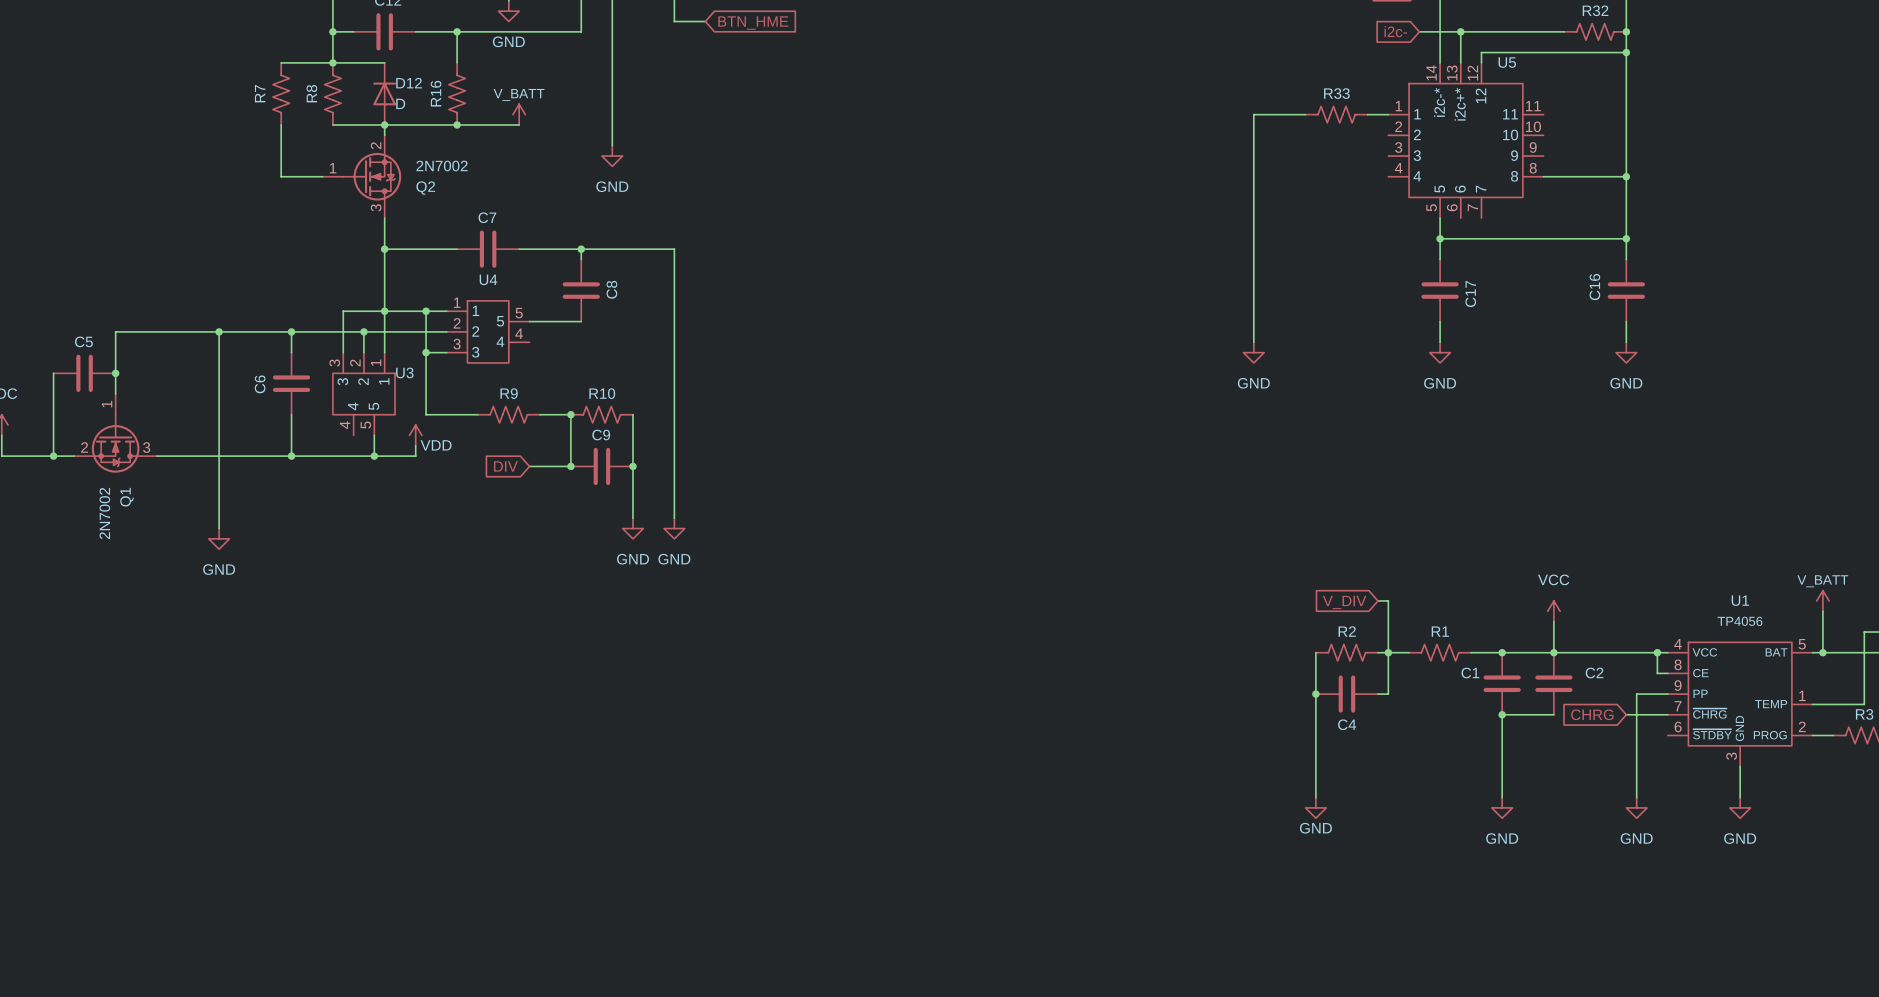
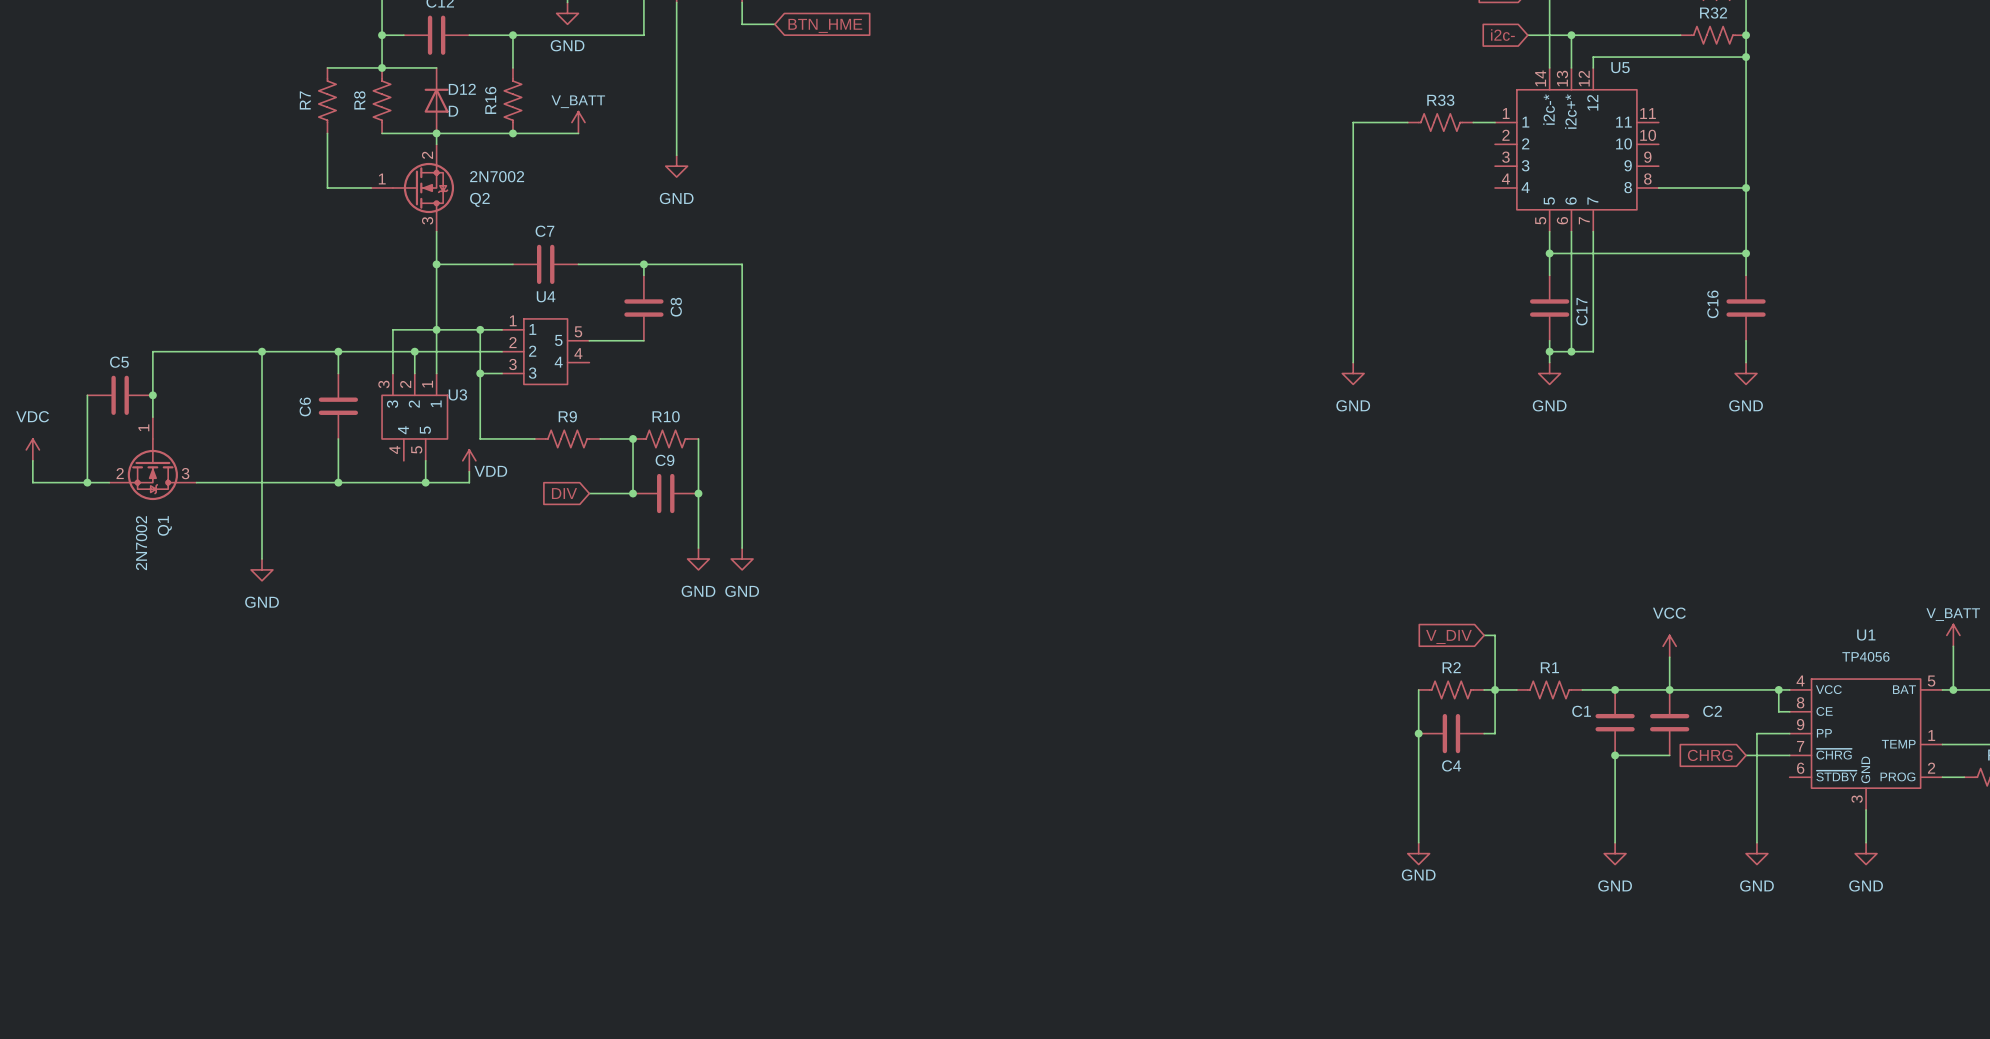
wire: none -> (1571, 231) (1571, 351)
wire: none -> (1593, 231) (1593, 351) (1549, 351)
junction: none -> (1549, 351)
junction: none -> (1571, 351)

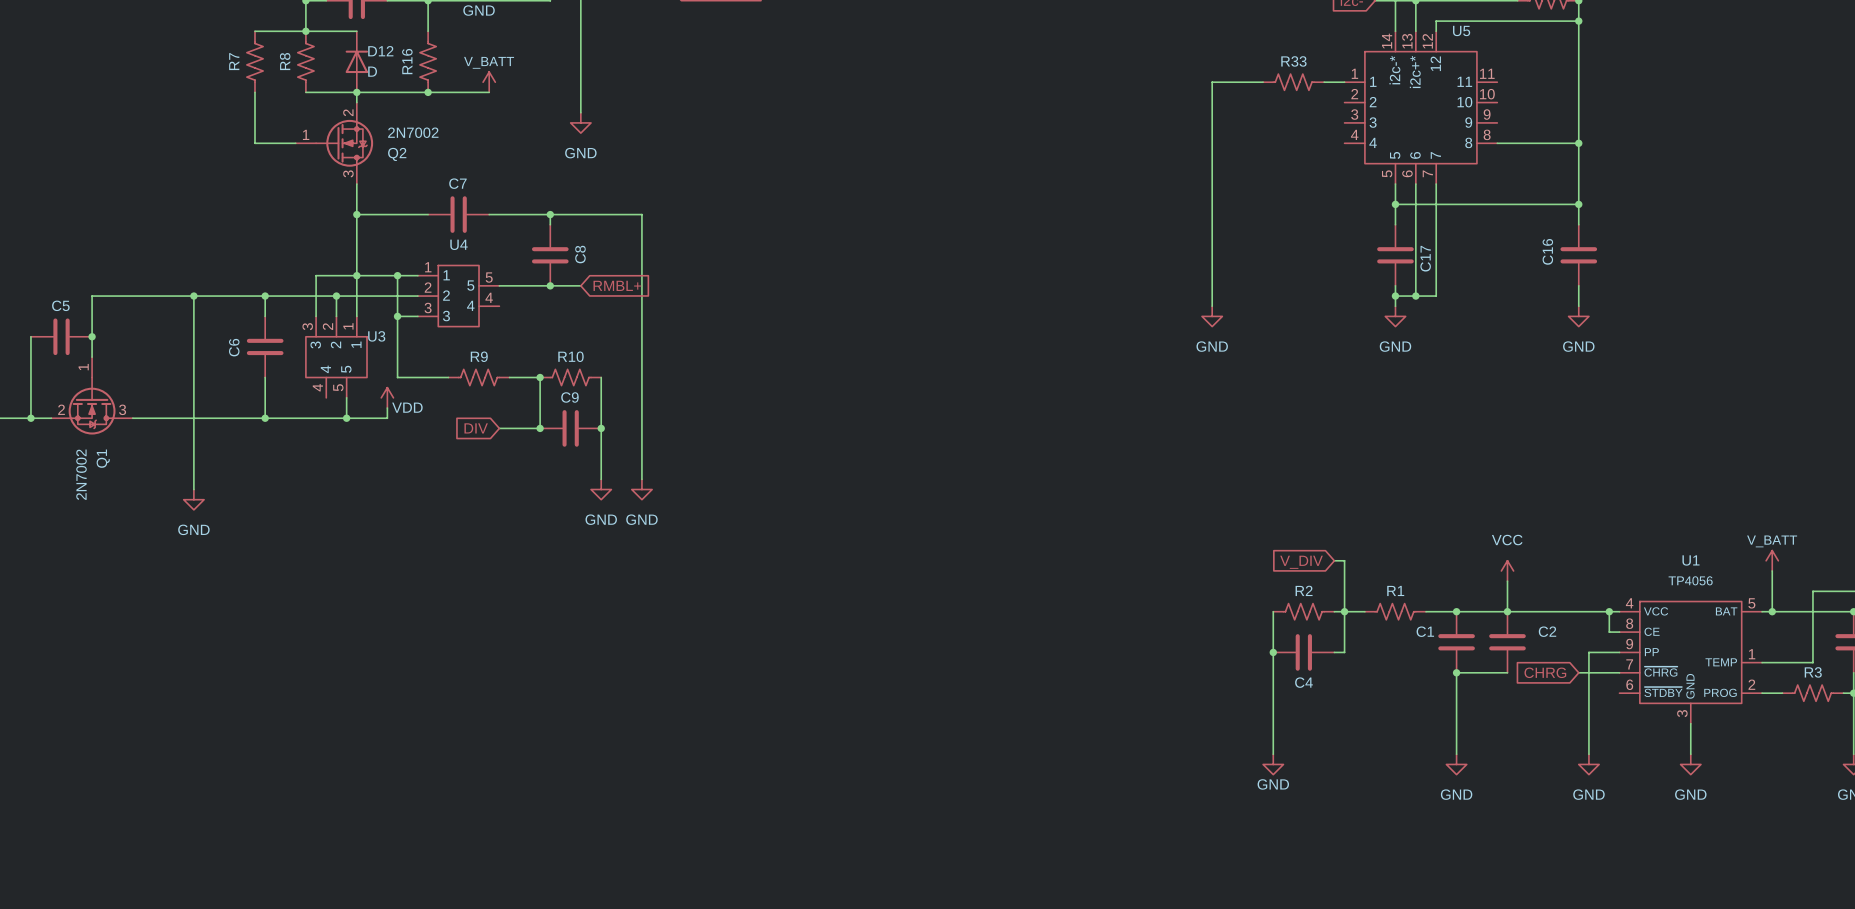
wire: none -> (550, 285) (580, 285)
junction: none -> (550, 285)
global label: none -> RMBL+ (617, 285)

